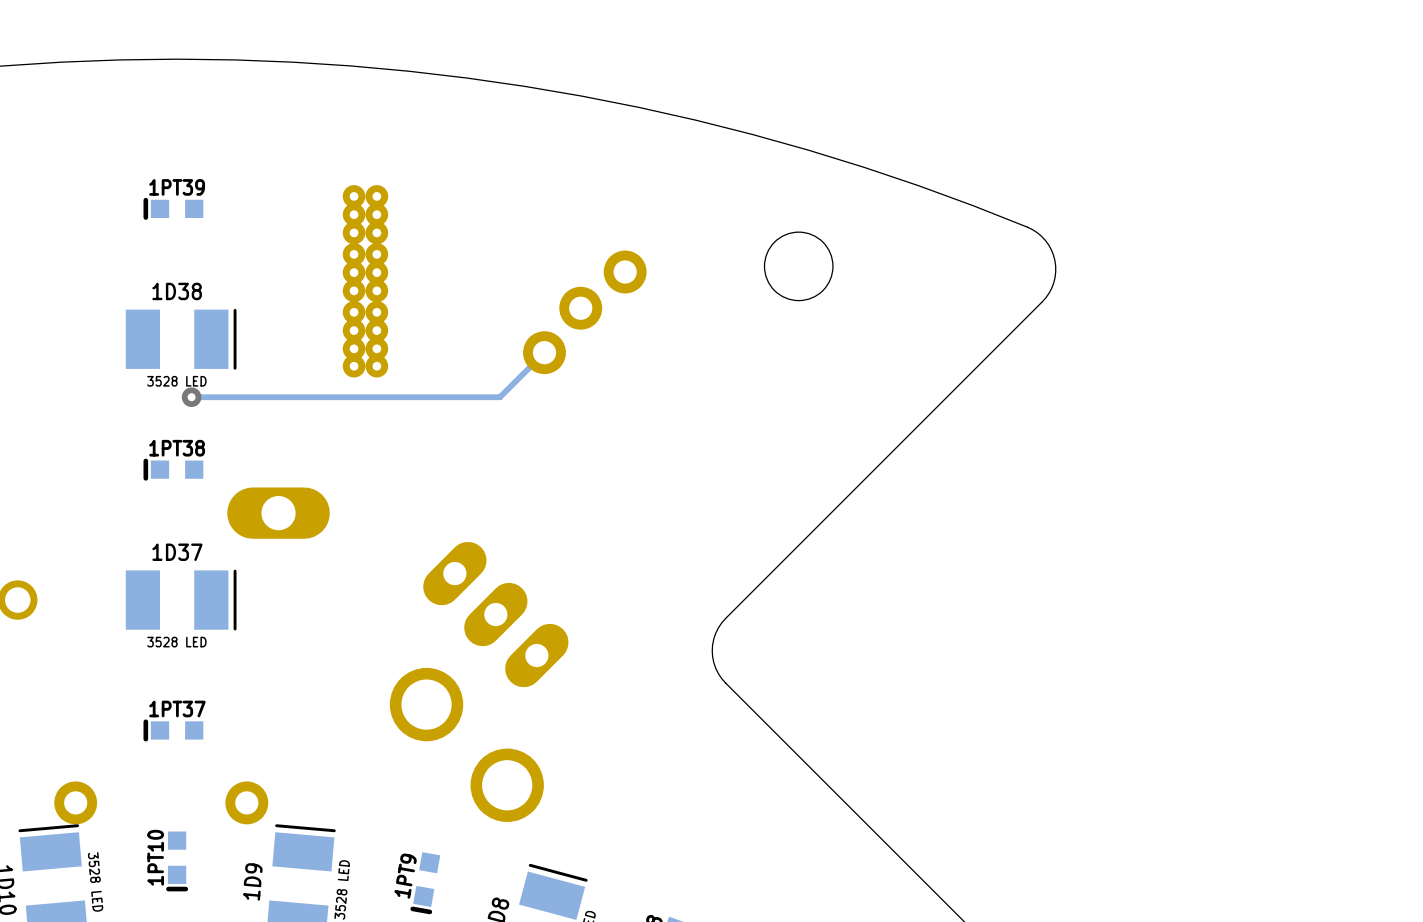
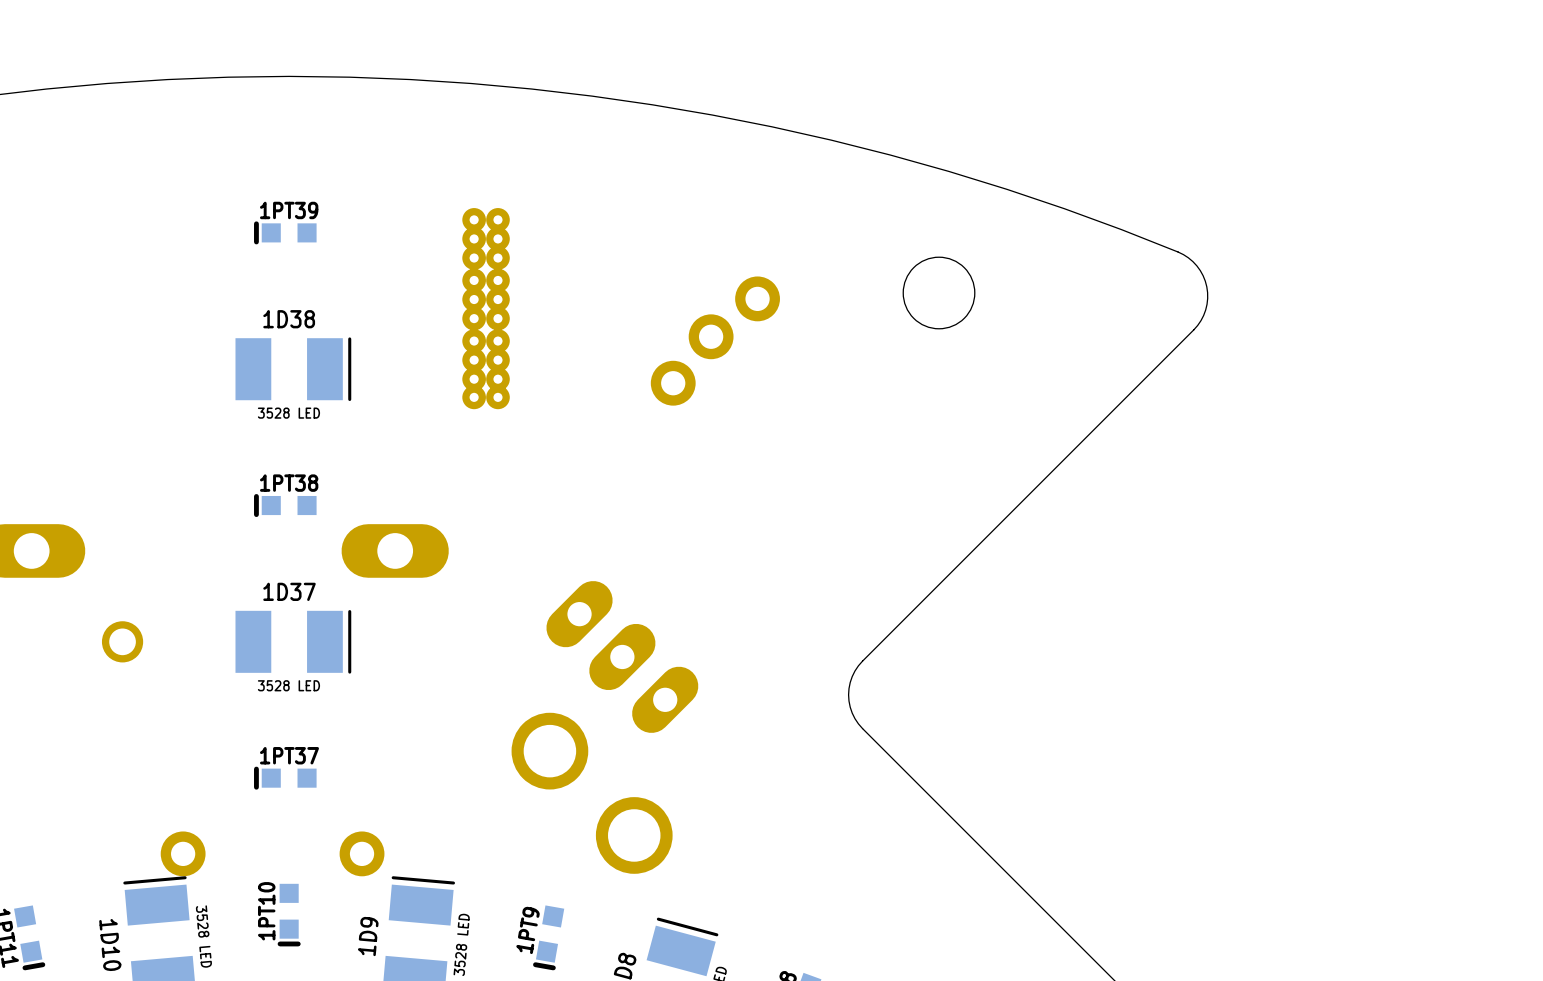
track: (544, 352) (499, 397) (191, 397) -> none
via: (191, 397) -> none

